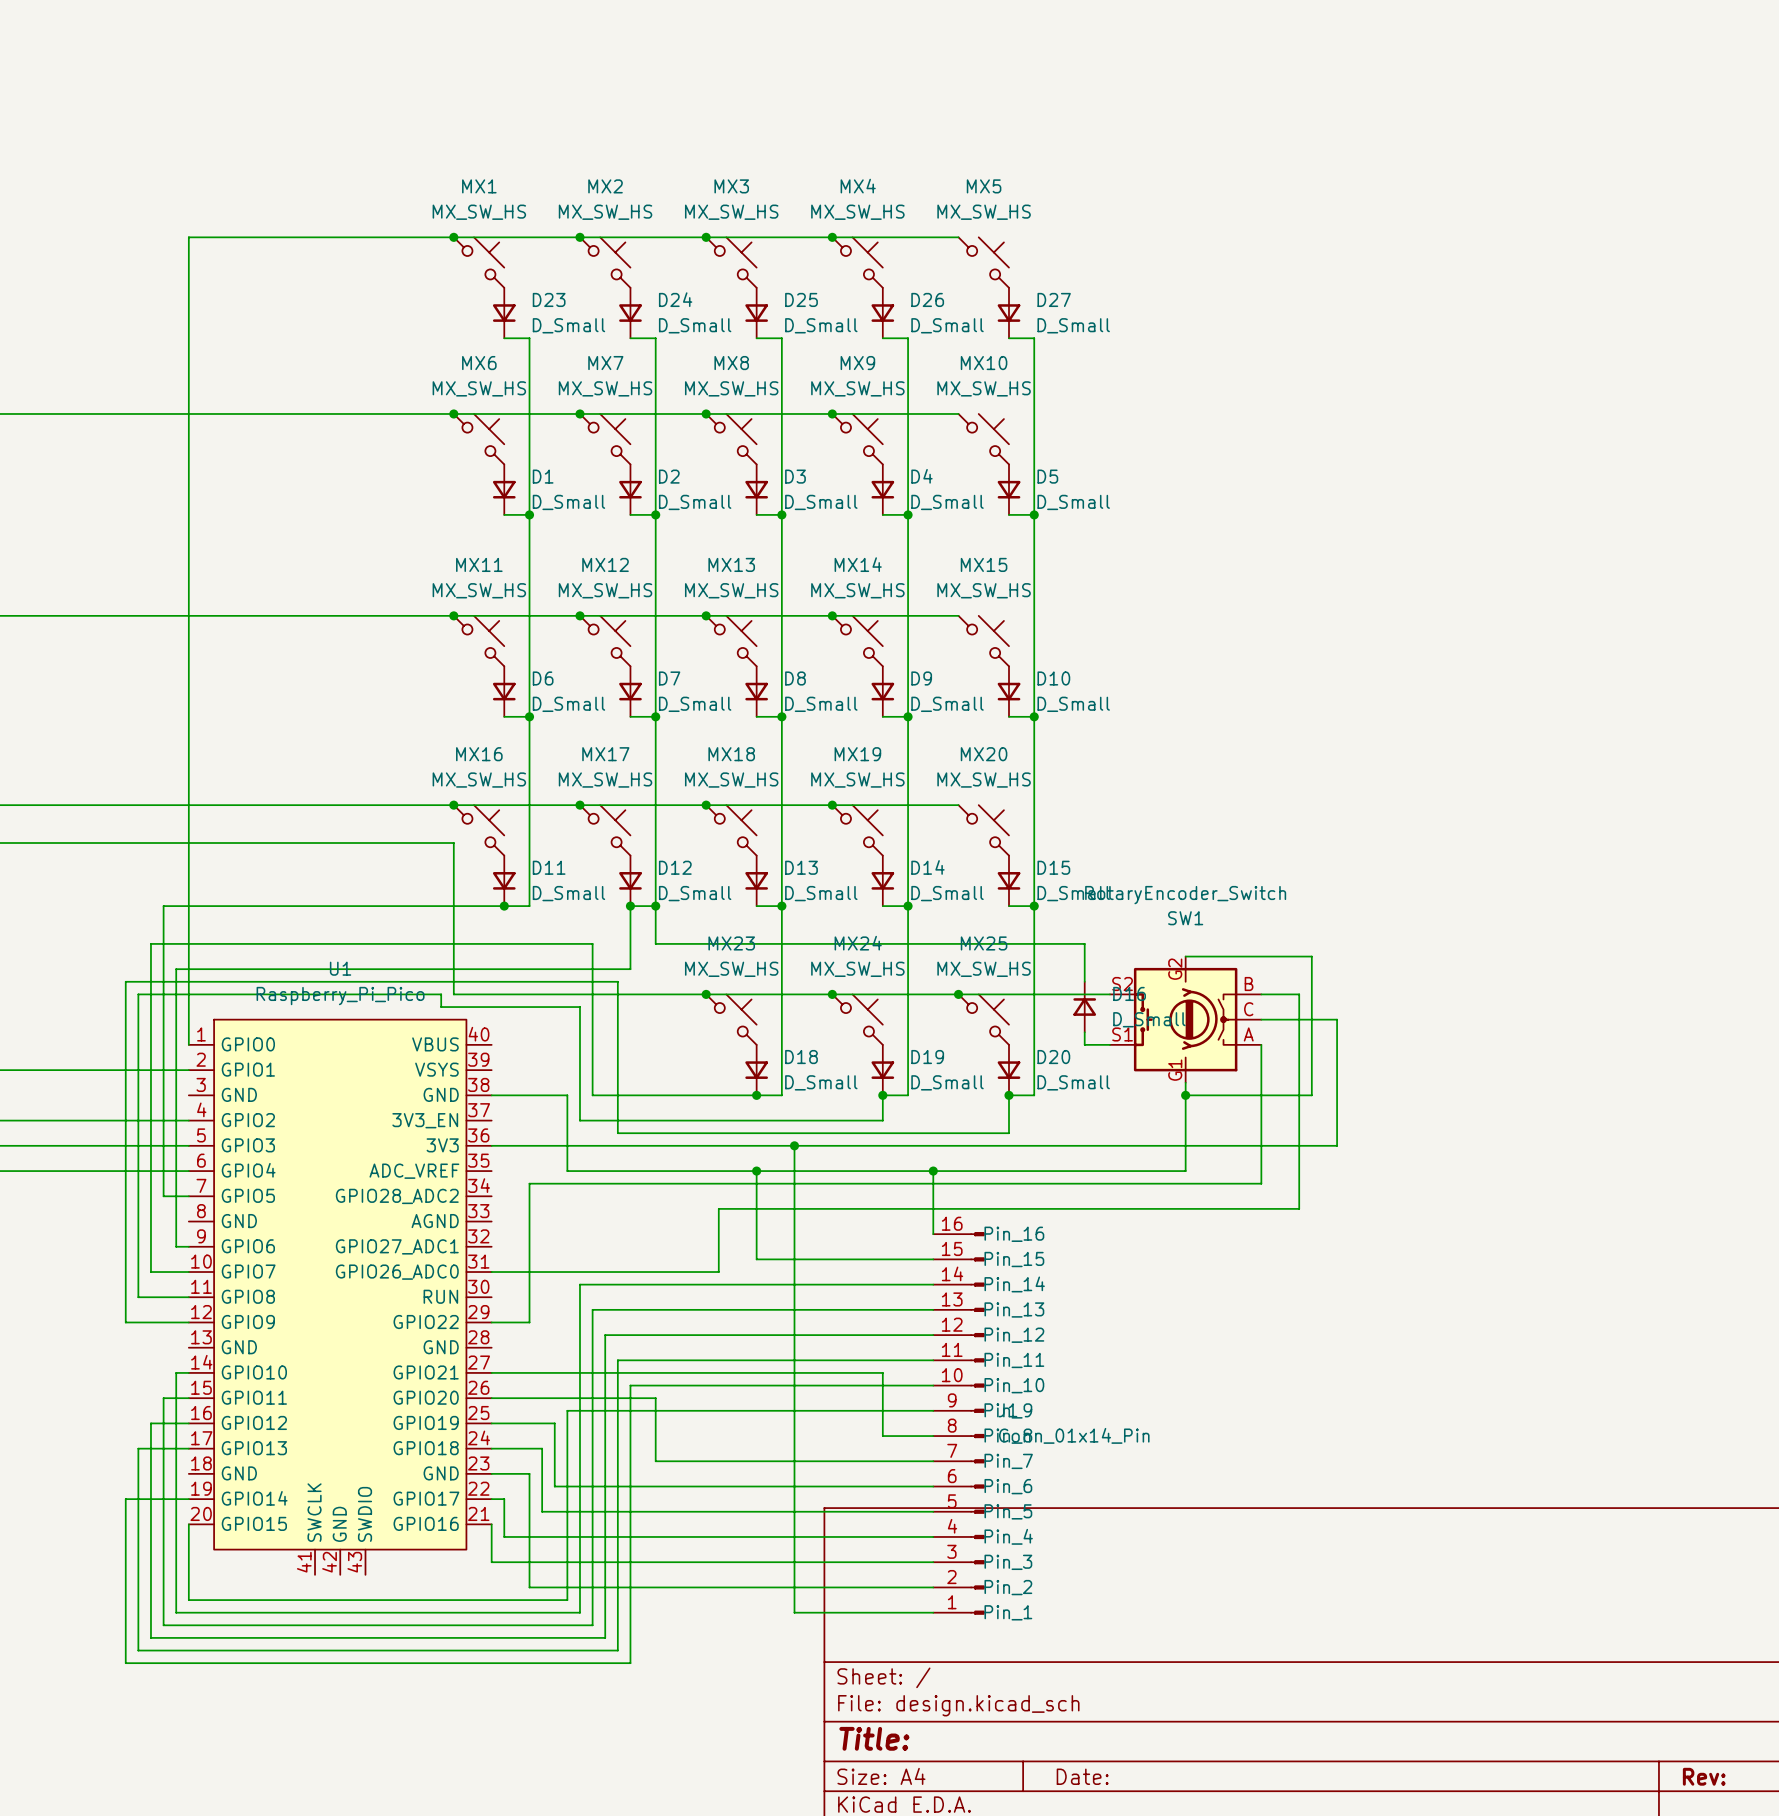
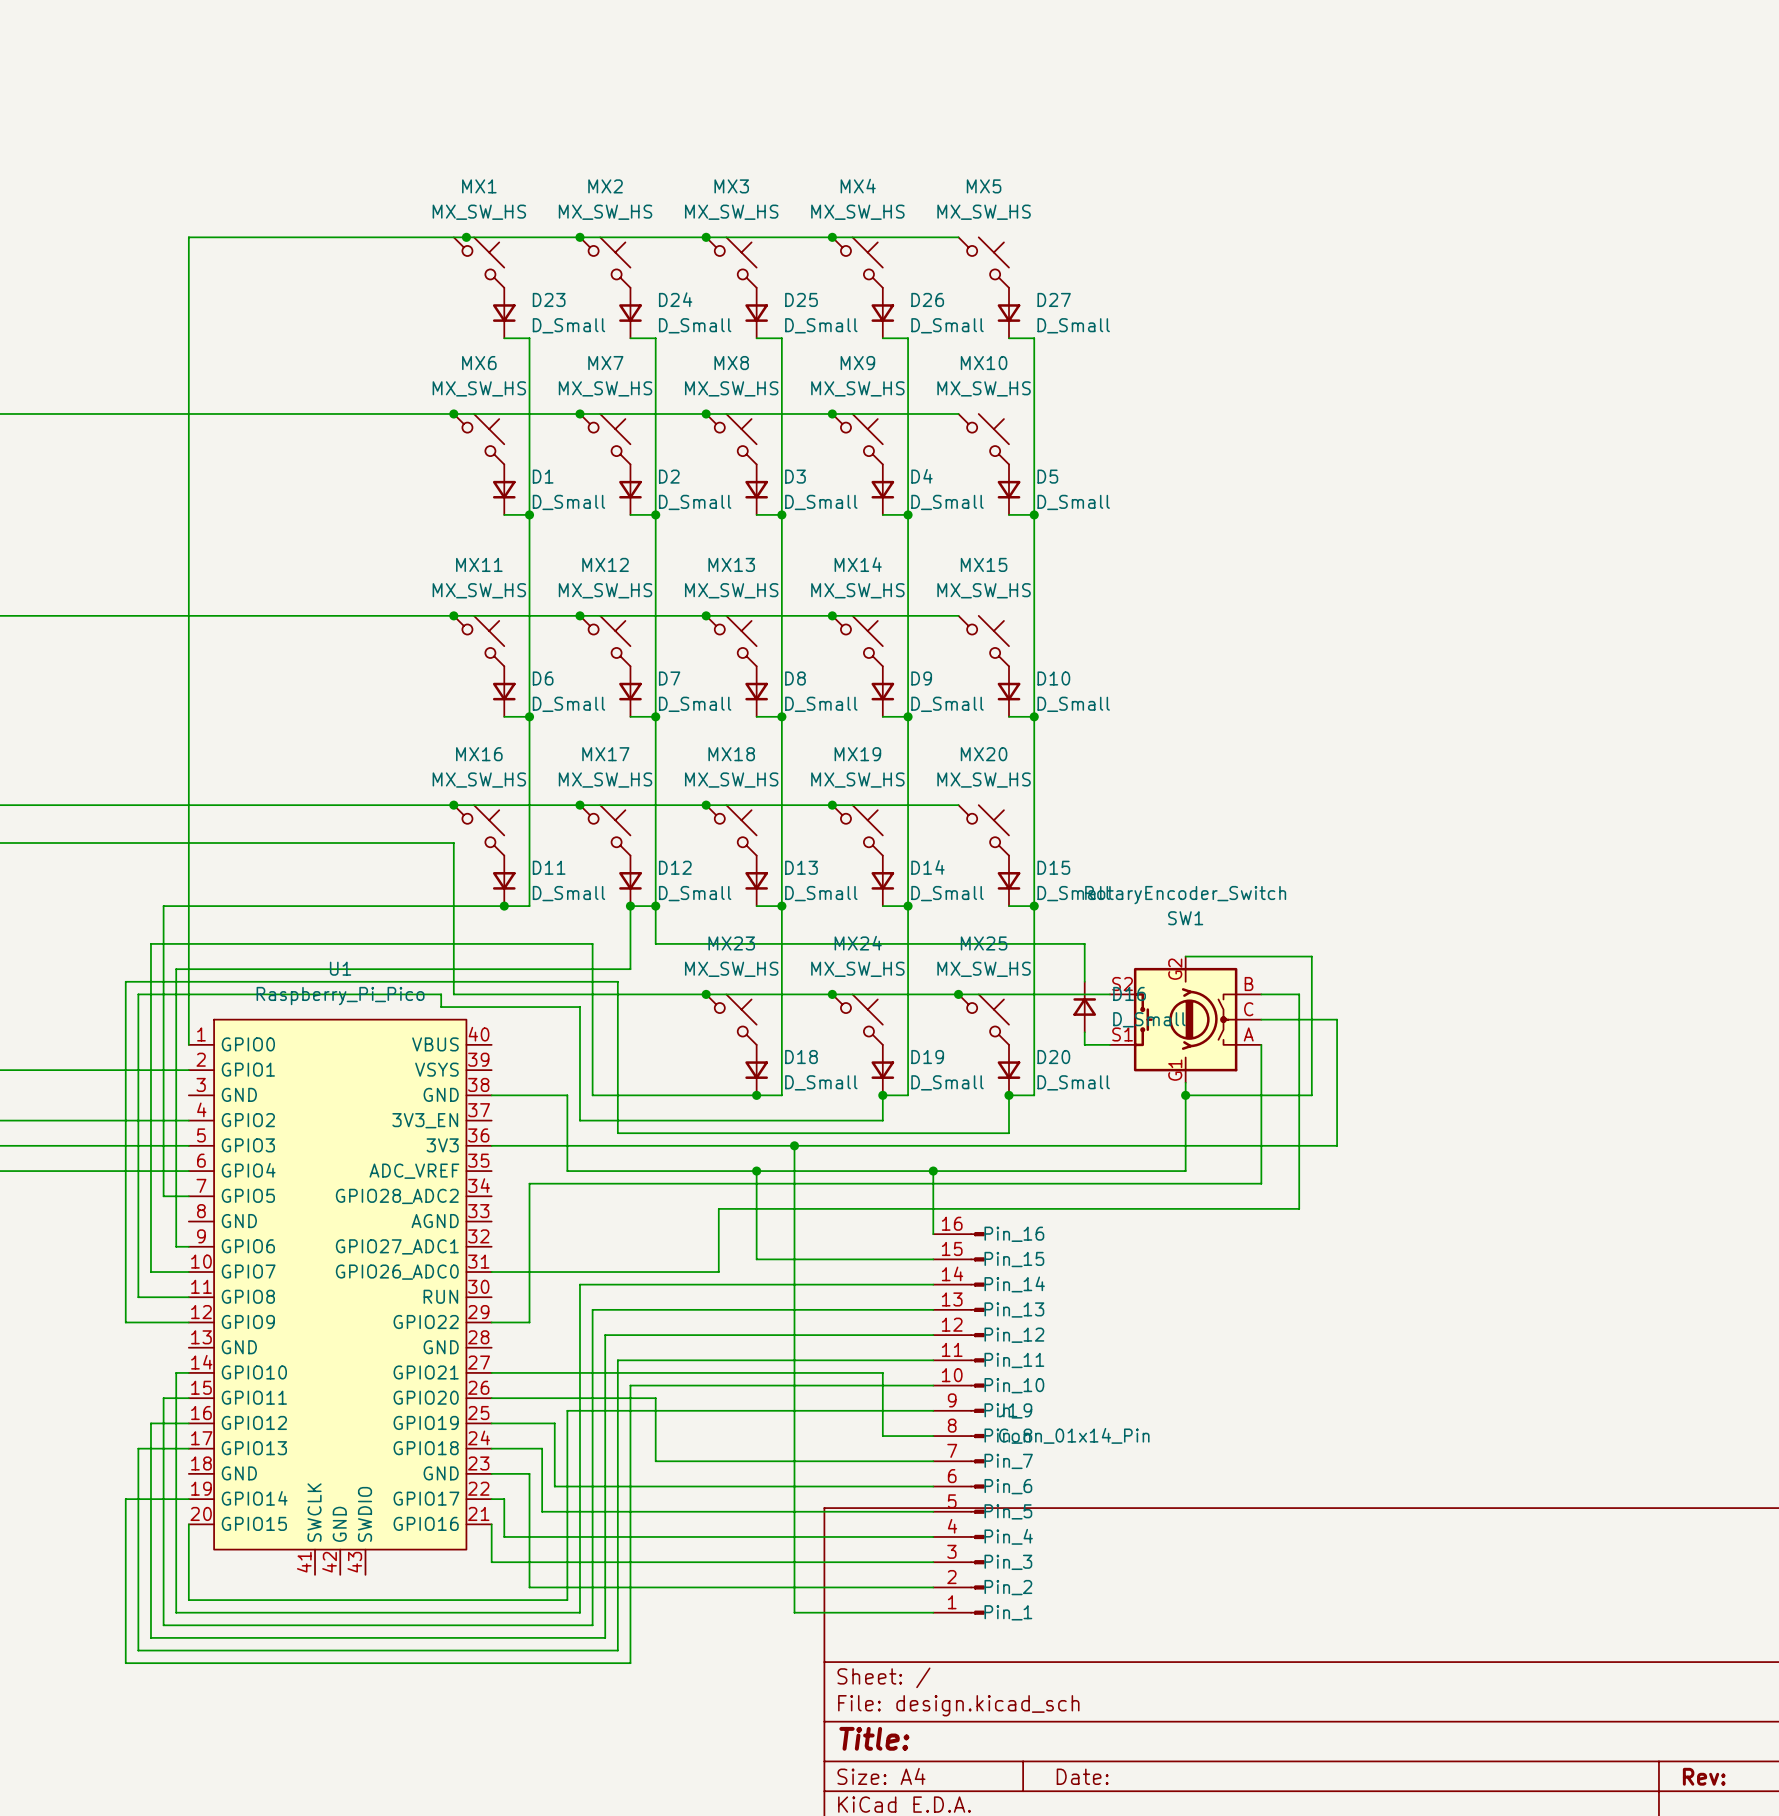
junction position: (453, 237) -> (466, 237)

